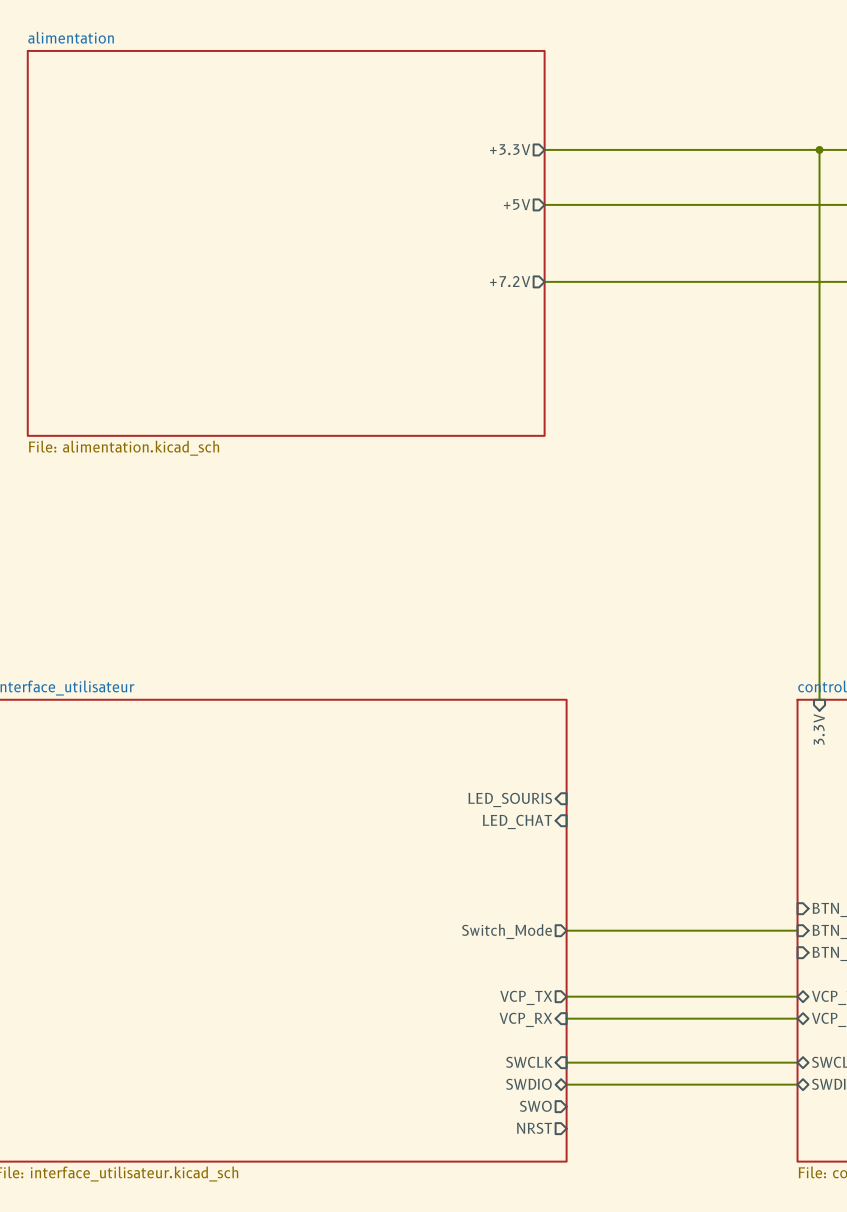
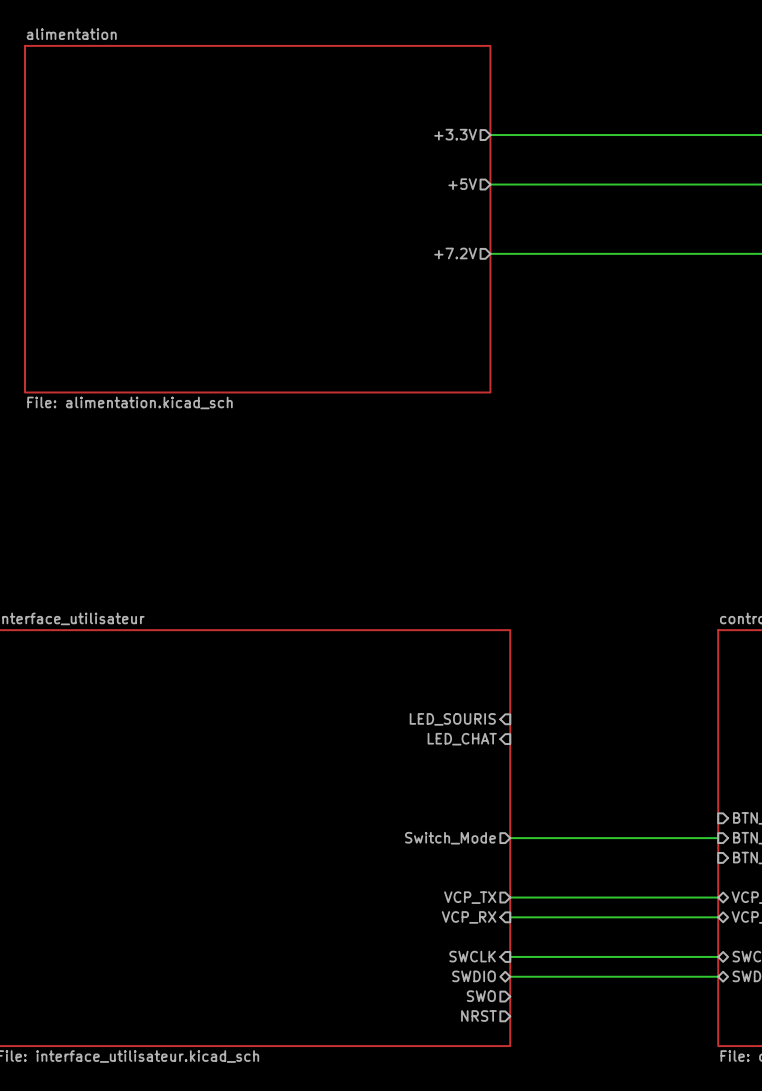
wire: (819, 149) (819, 699) -> none
junction: (819, 149) -> none
sheet pin: 3.3V (819, 729) -> none

